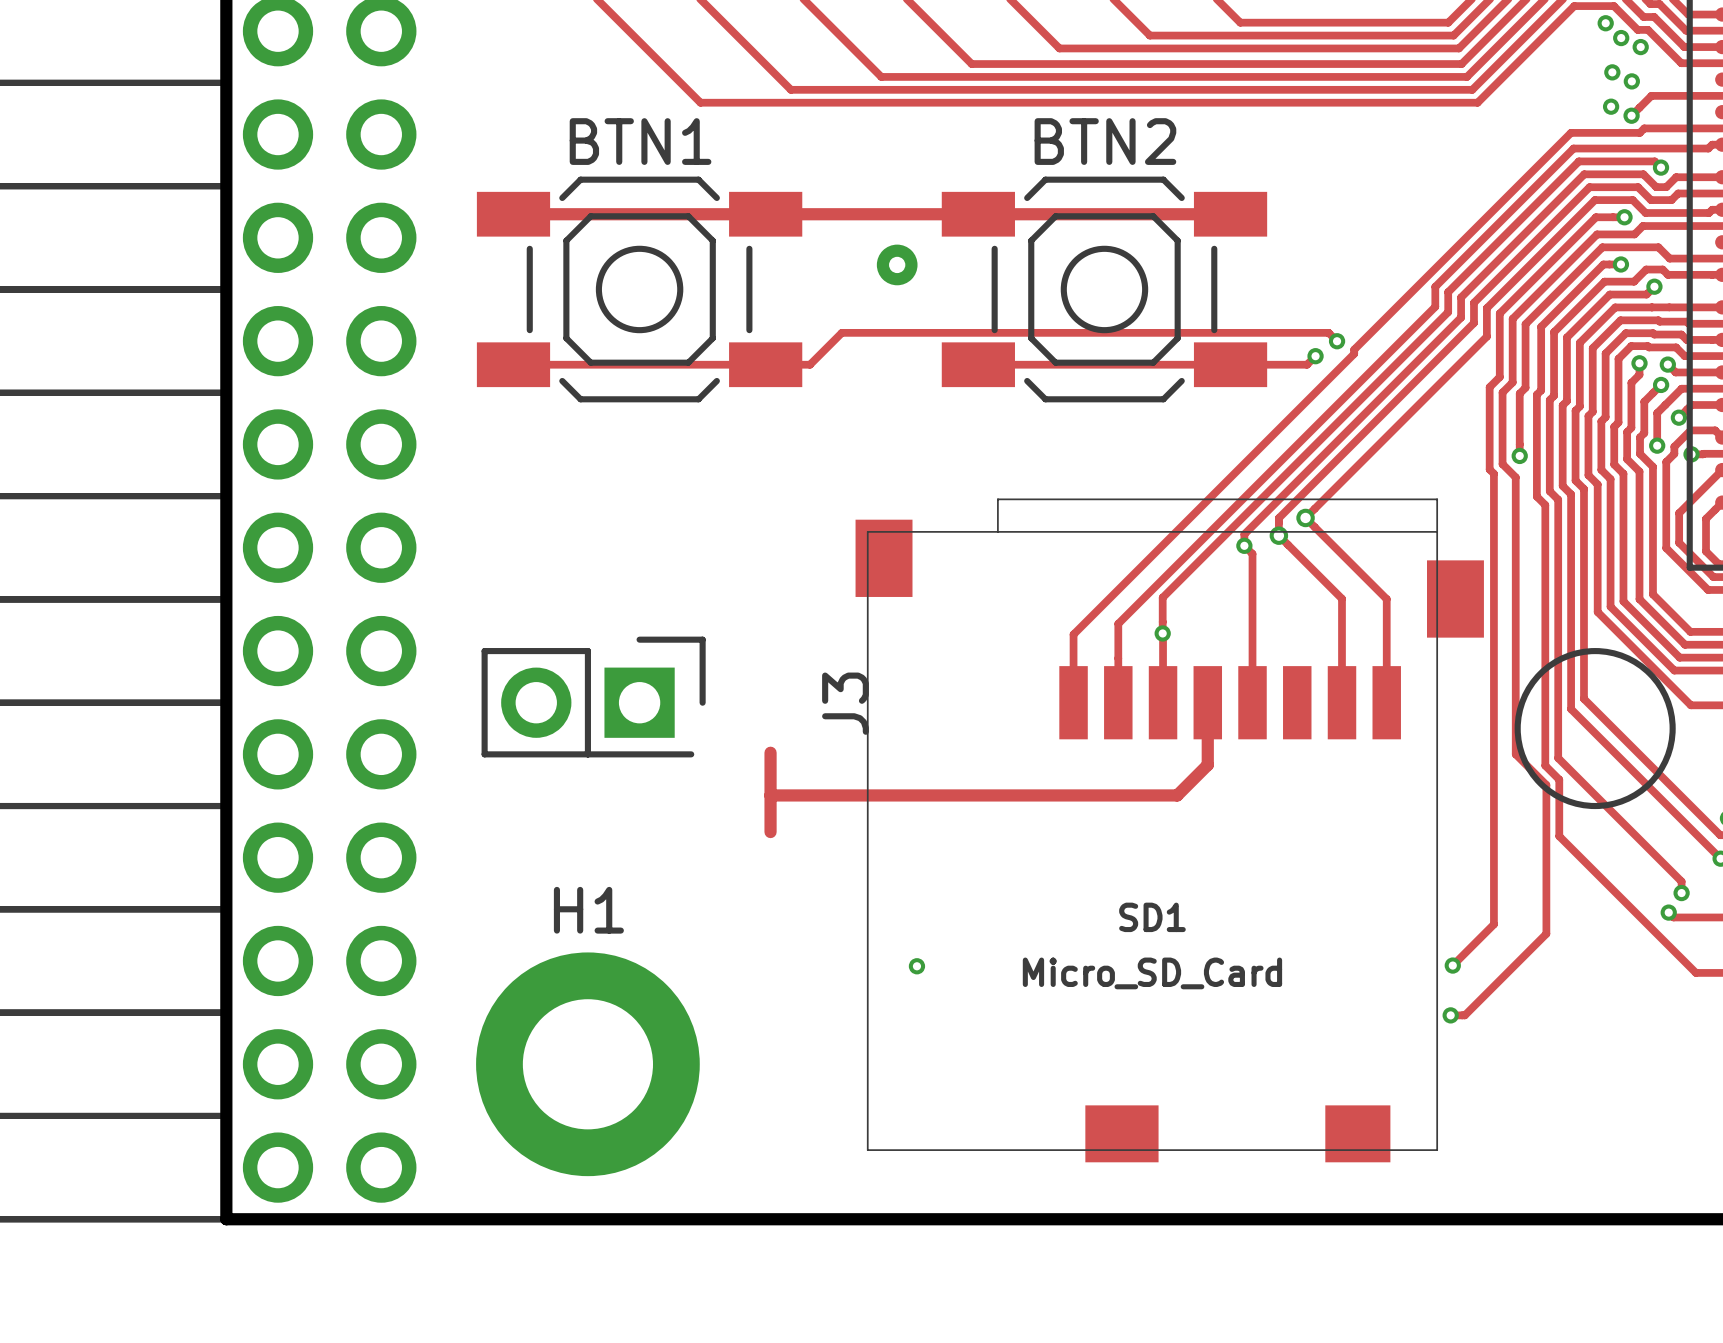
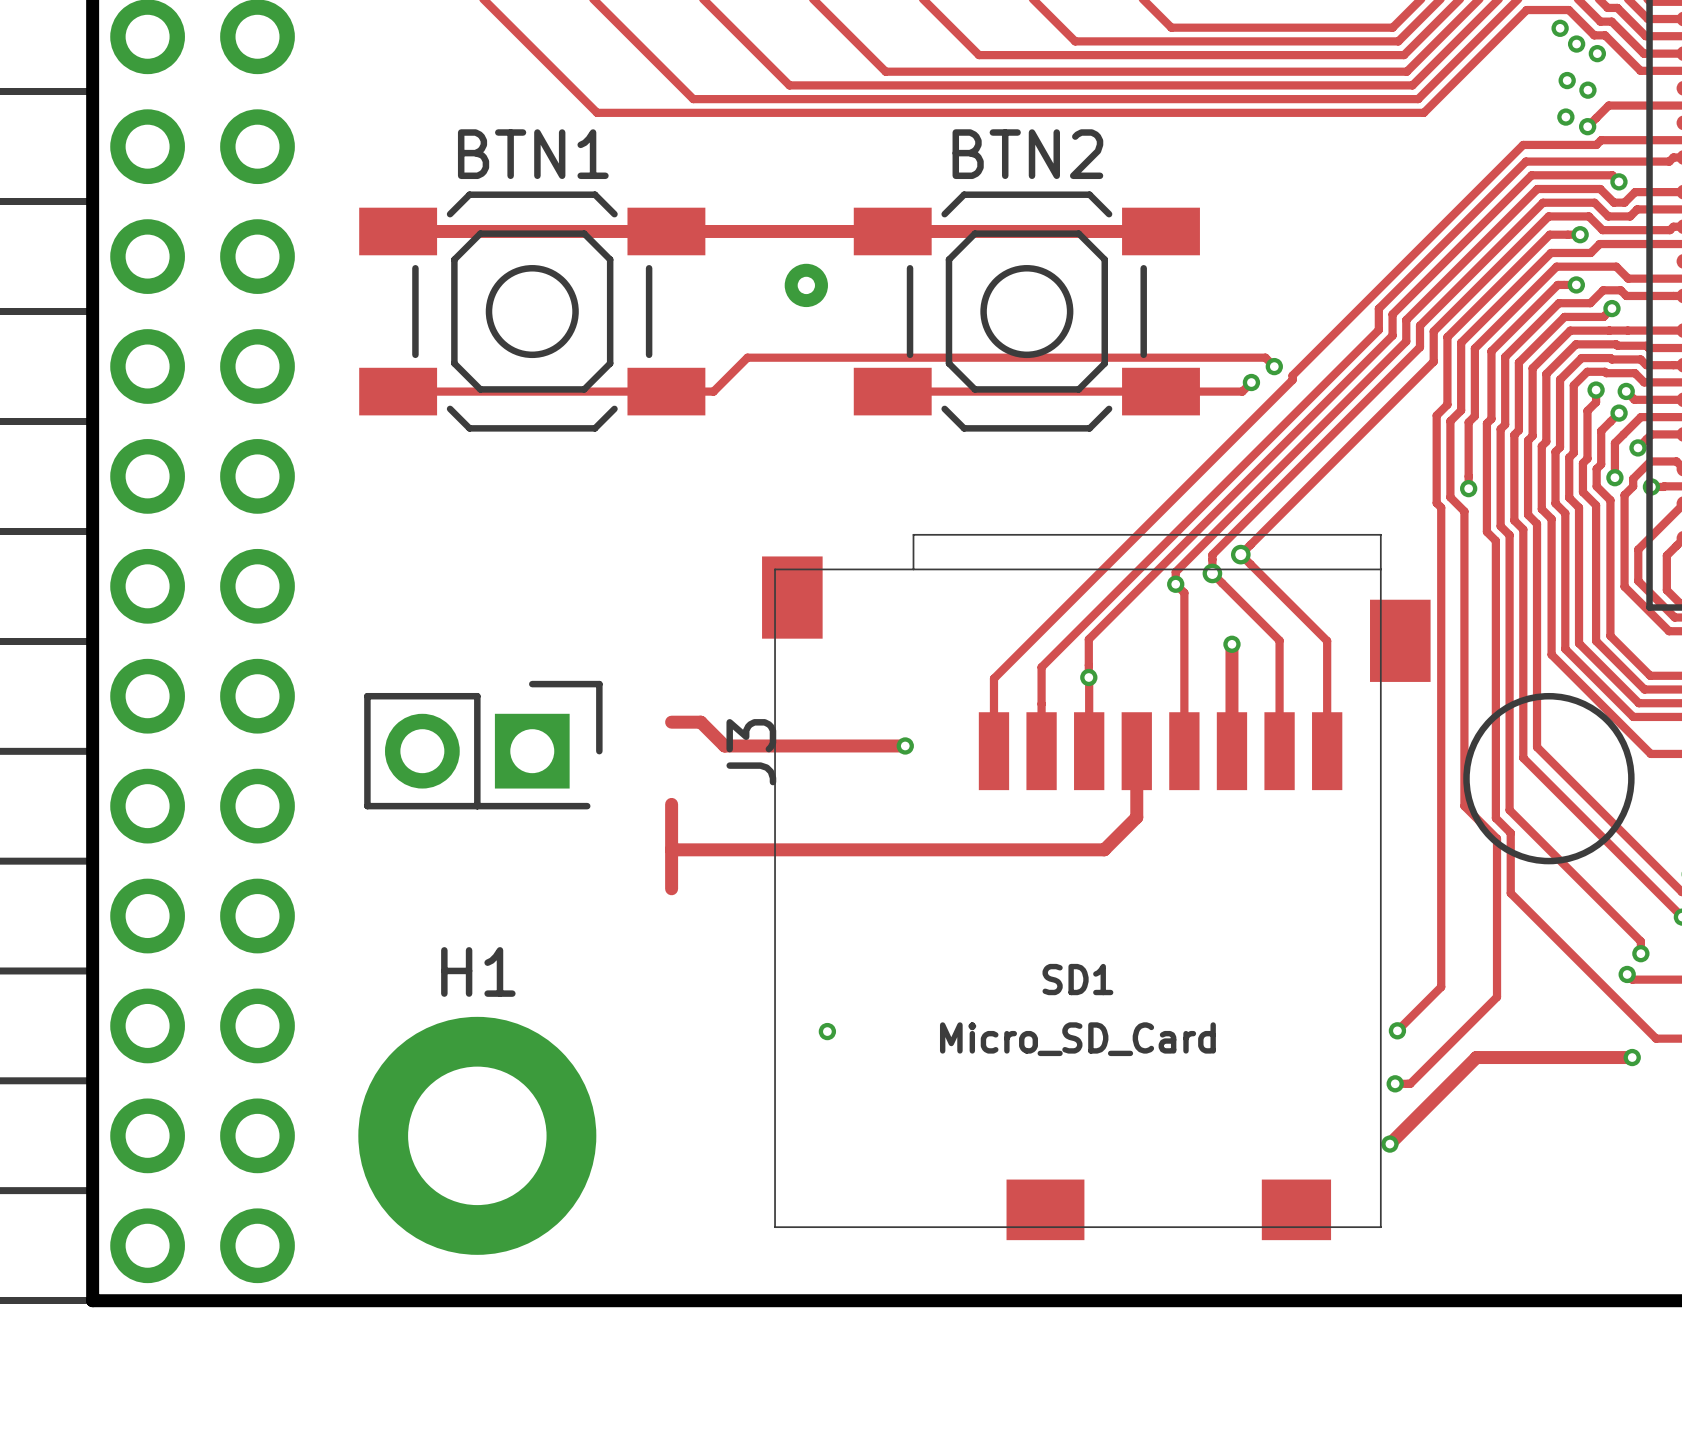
track: none -> (1231, 644) (1231, 751)
via: none -> (1231, 644)
track: none -> (671, 722) (700, 722) (724, 745) (905, 745)
via: none -> (905, 745)
track: none -> (1632, 1057) (1476, 1057) (1389, 1144)
via: none -> (1632, 1057)
via: none -> (1389, 1144)

